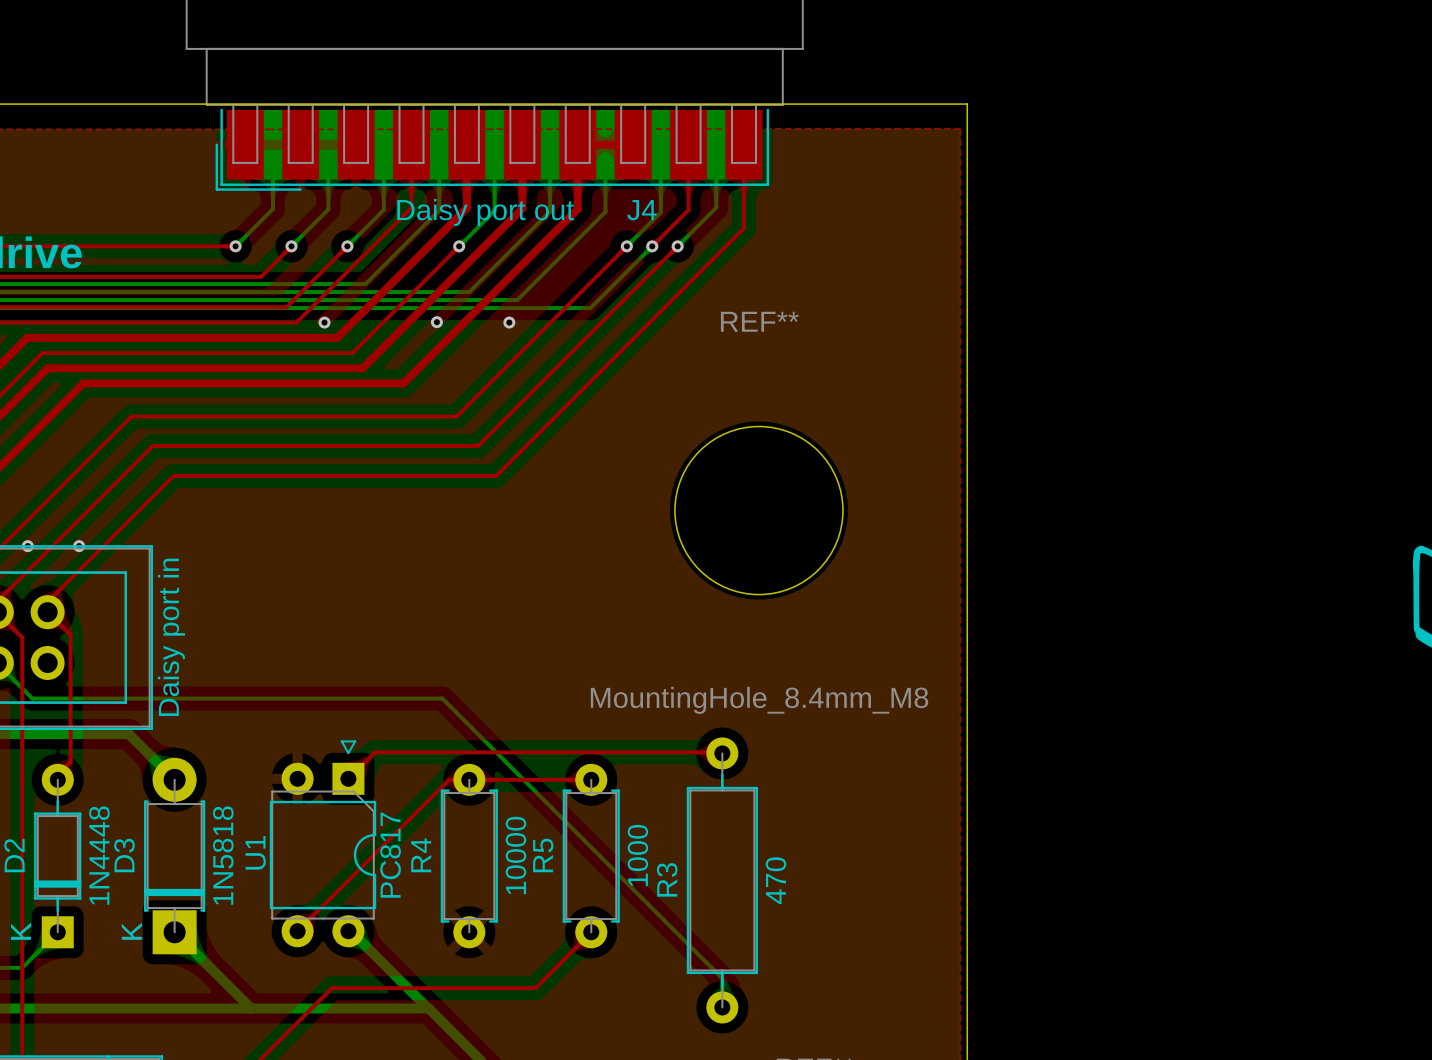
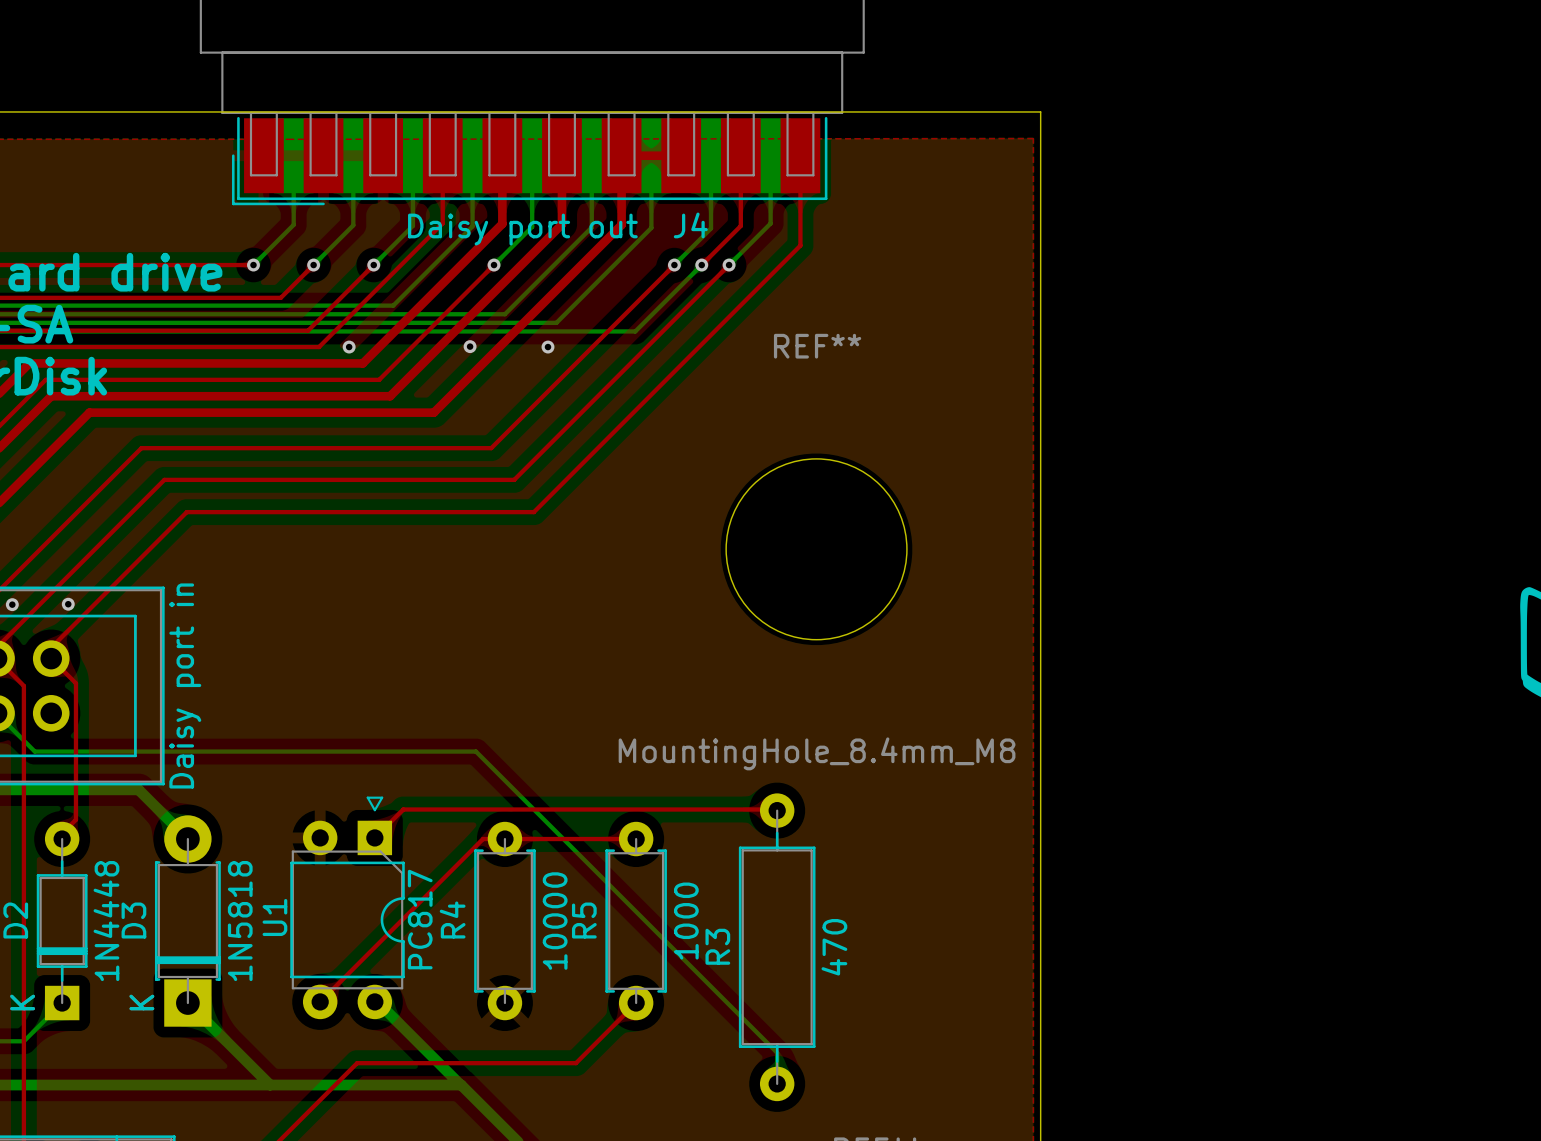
via: (27, 546) -> none
via: (79, 546) -> none
via: none -> (68, 604)
via: none -> (12, 604)

